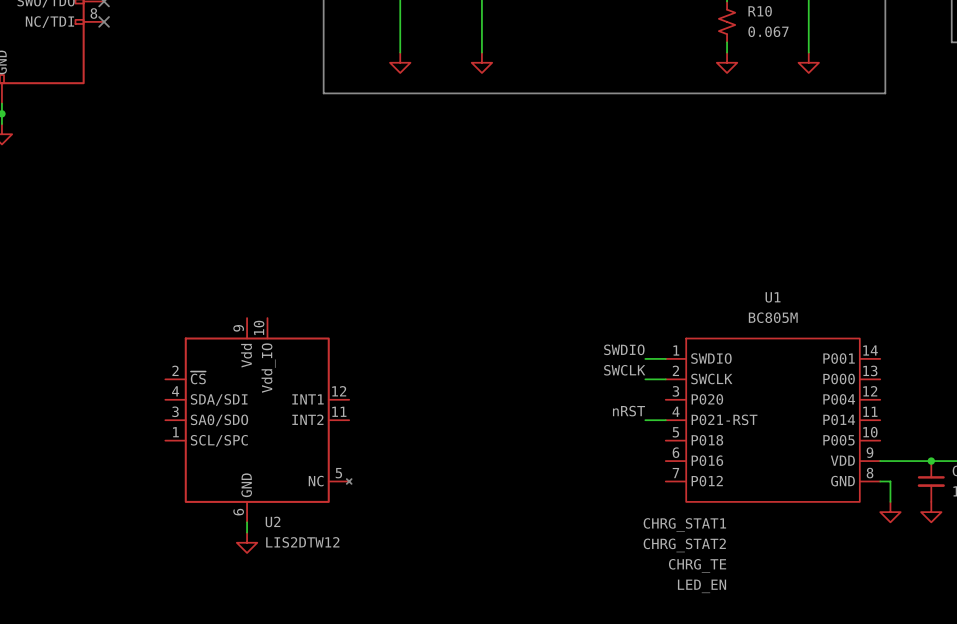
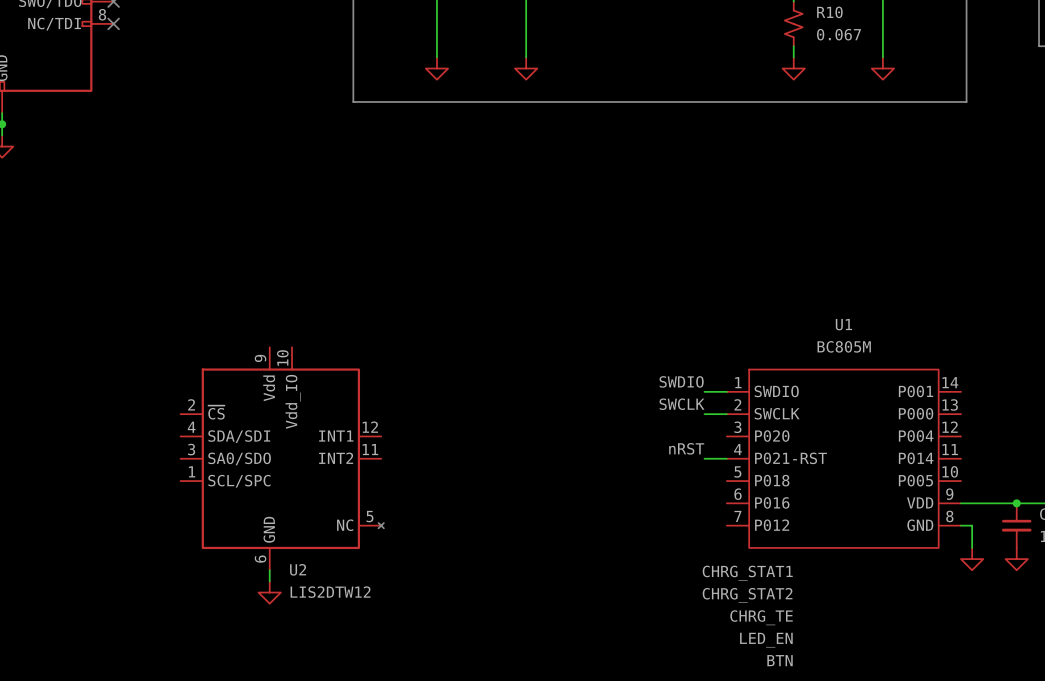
label: none -> BTN (780, 660)

